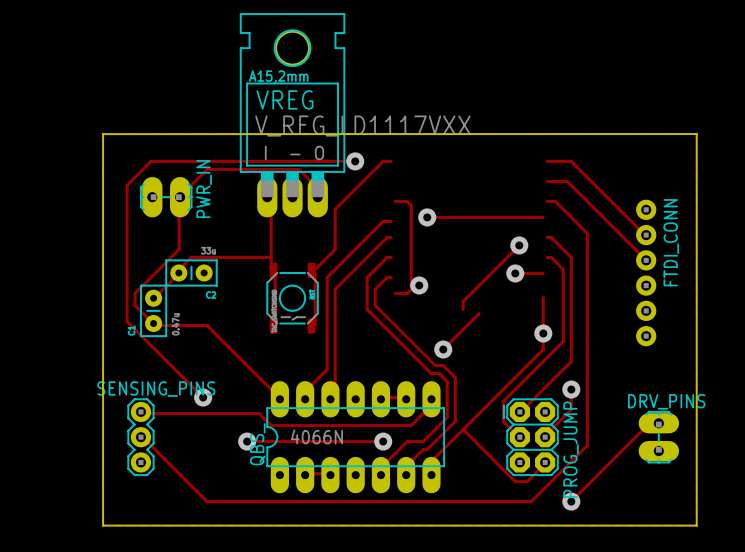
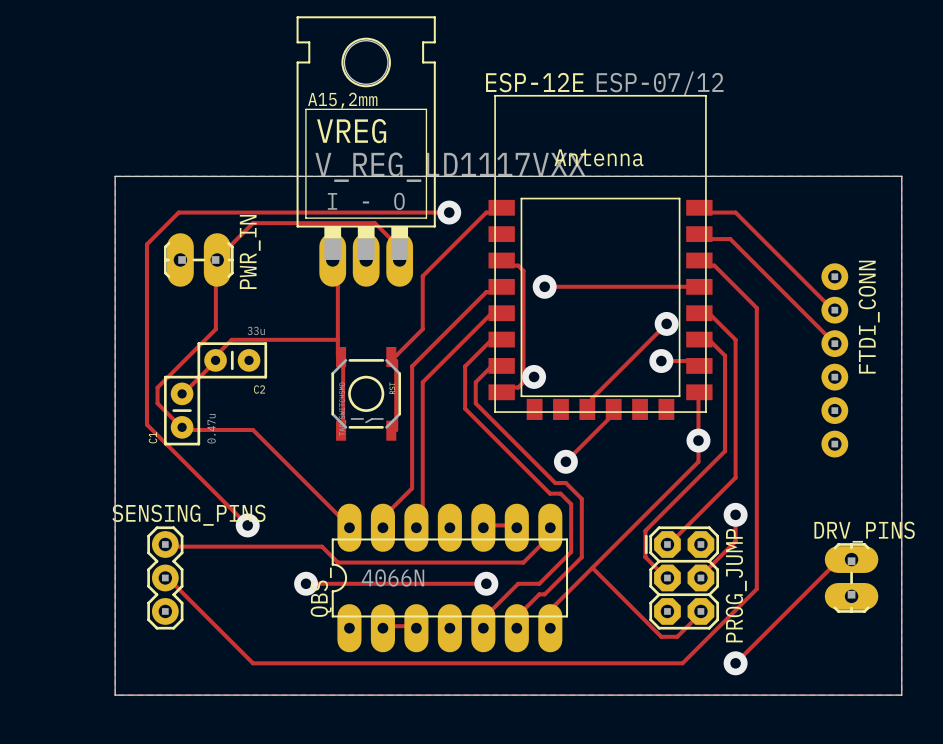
ESP-12E: none -> ESP-07/12 (600, 257)

